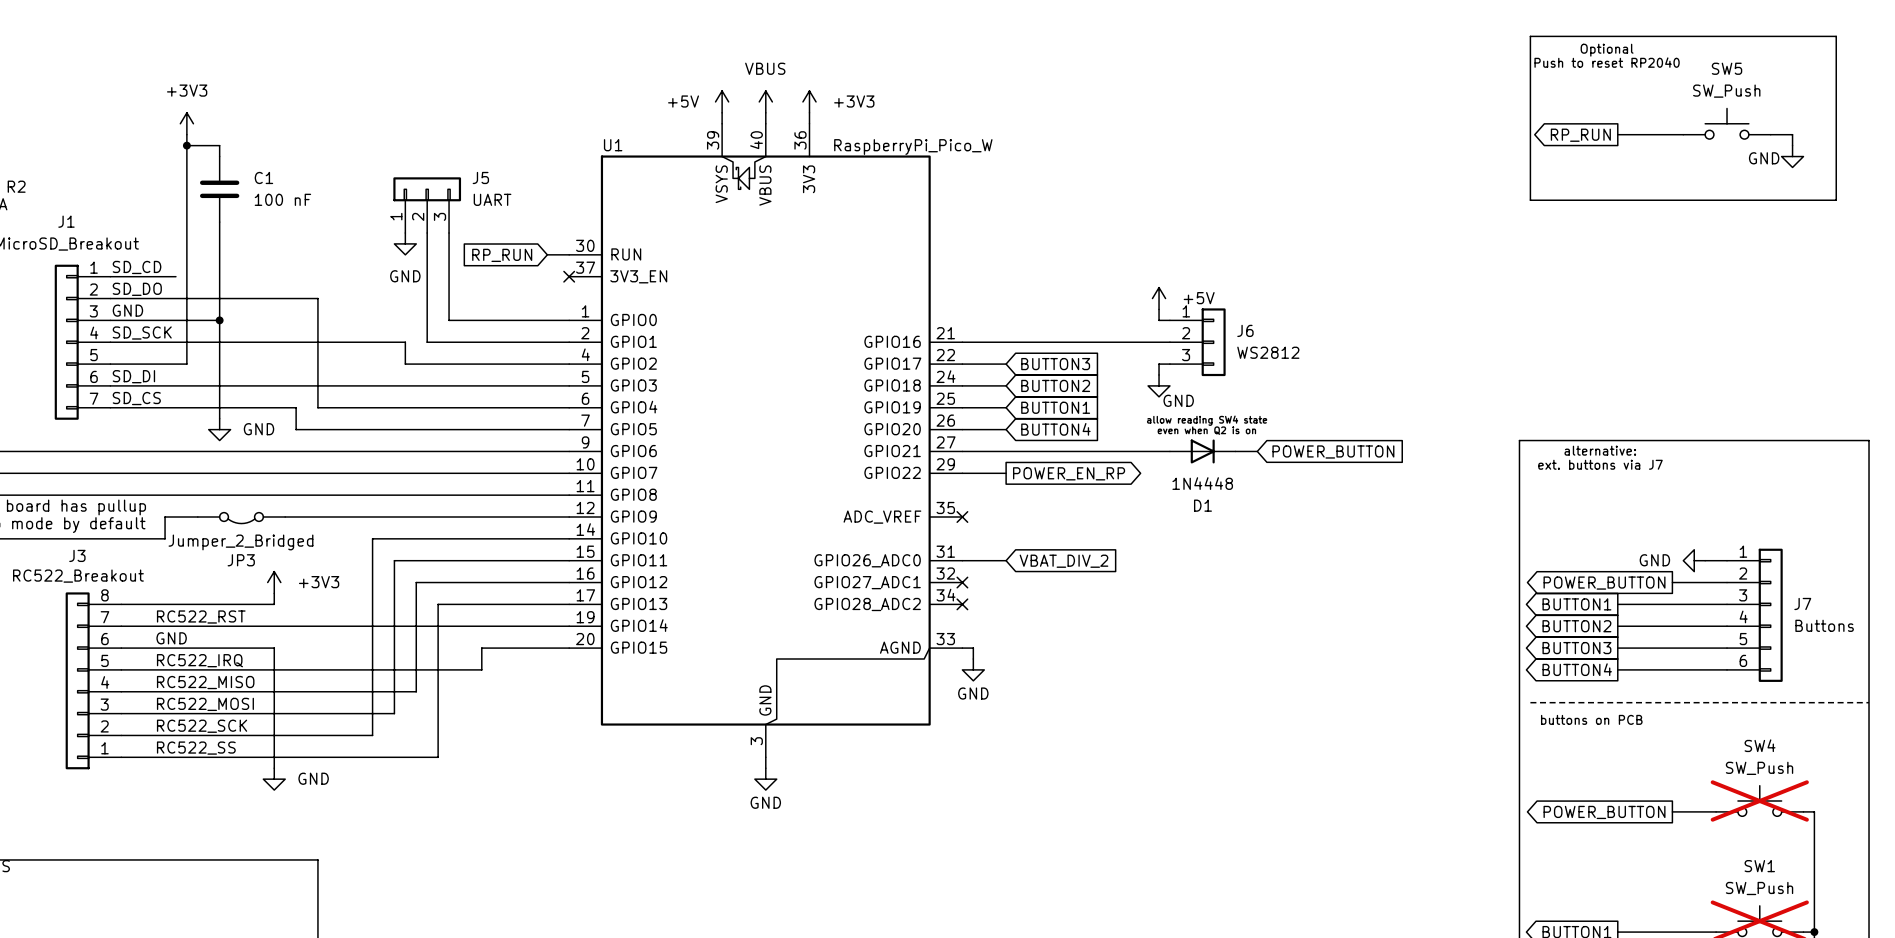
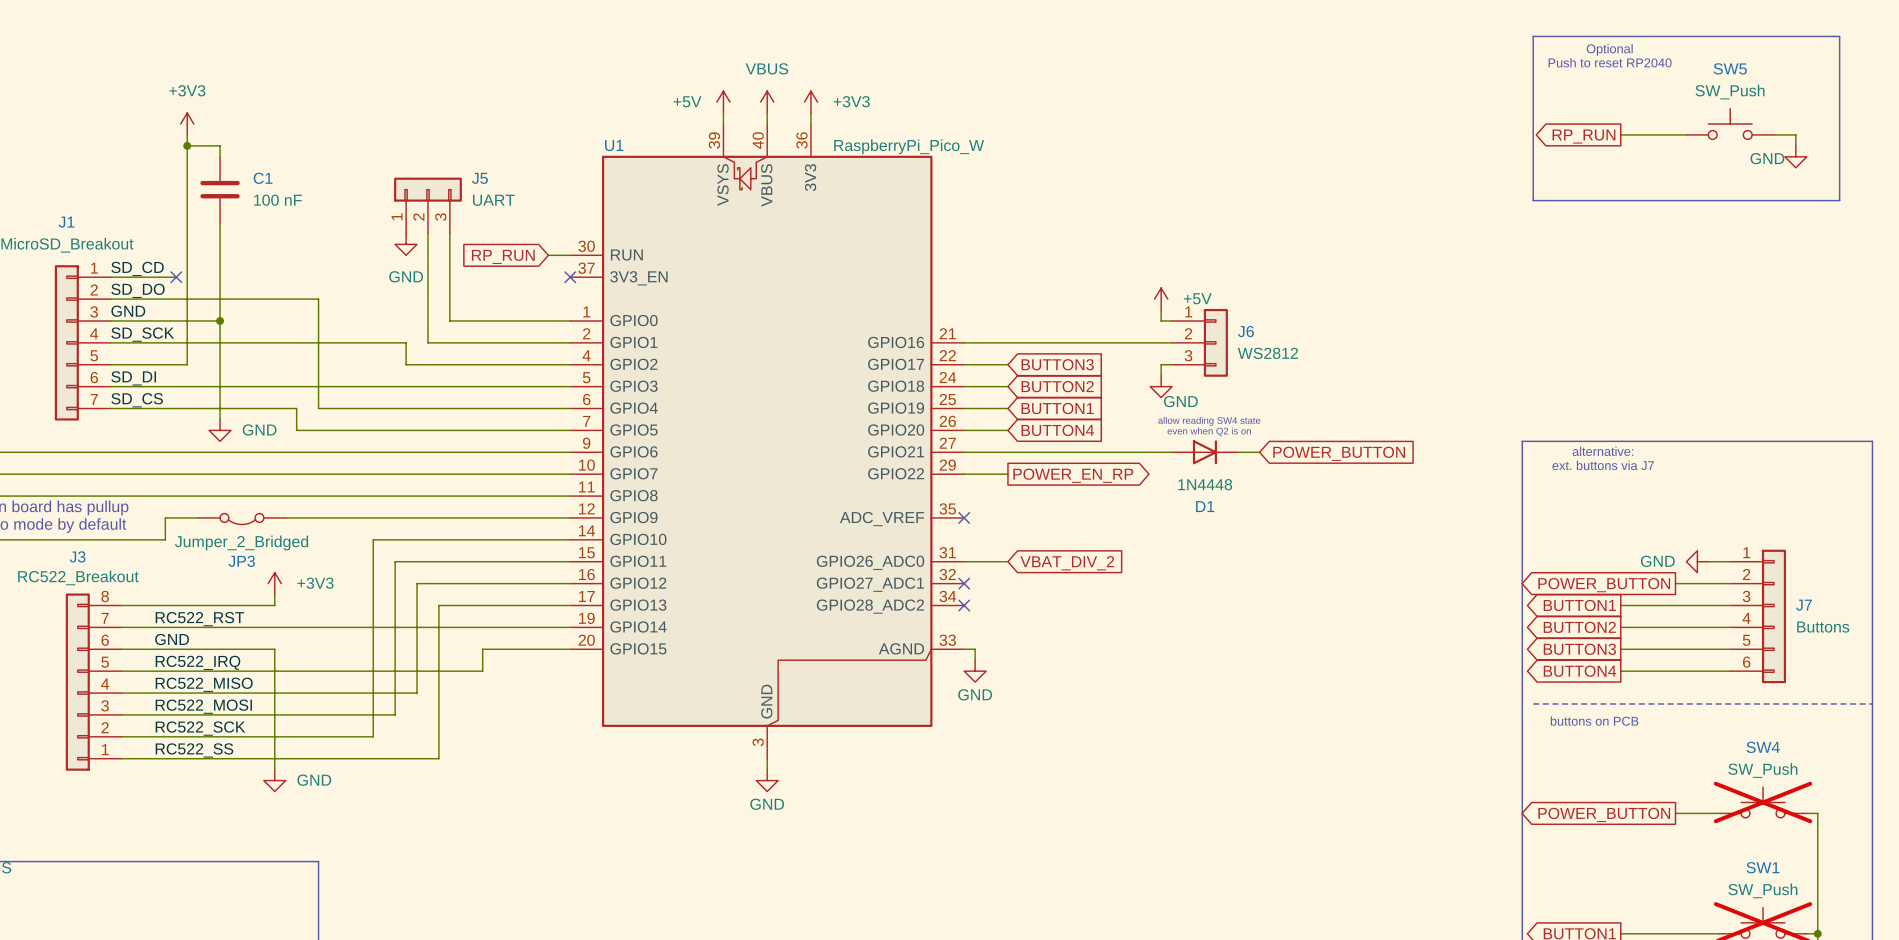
no-connect mark: none -> (176, 277)

